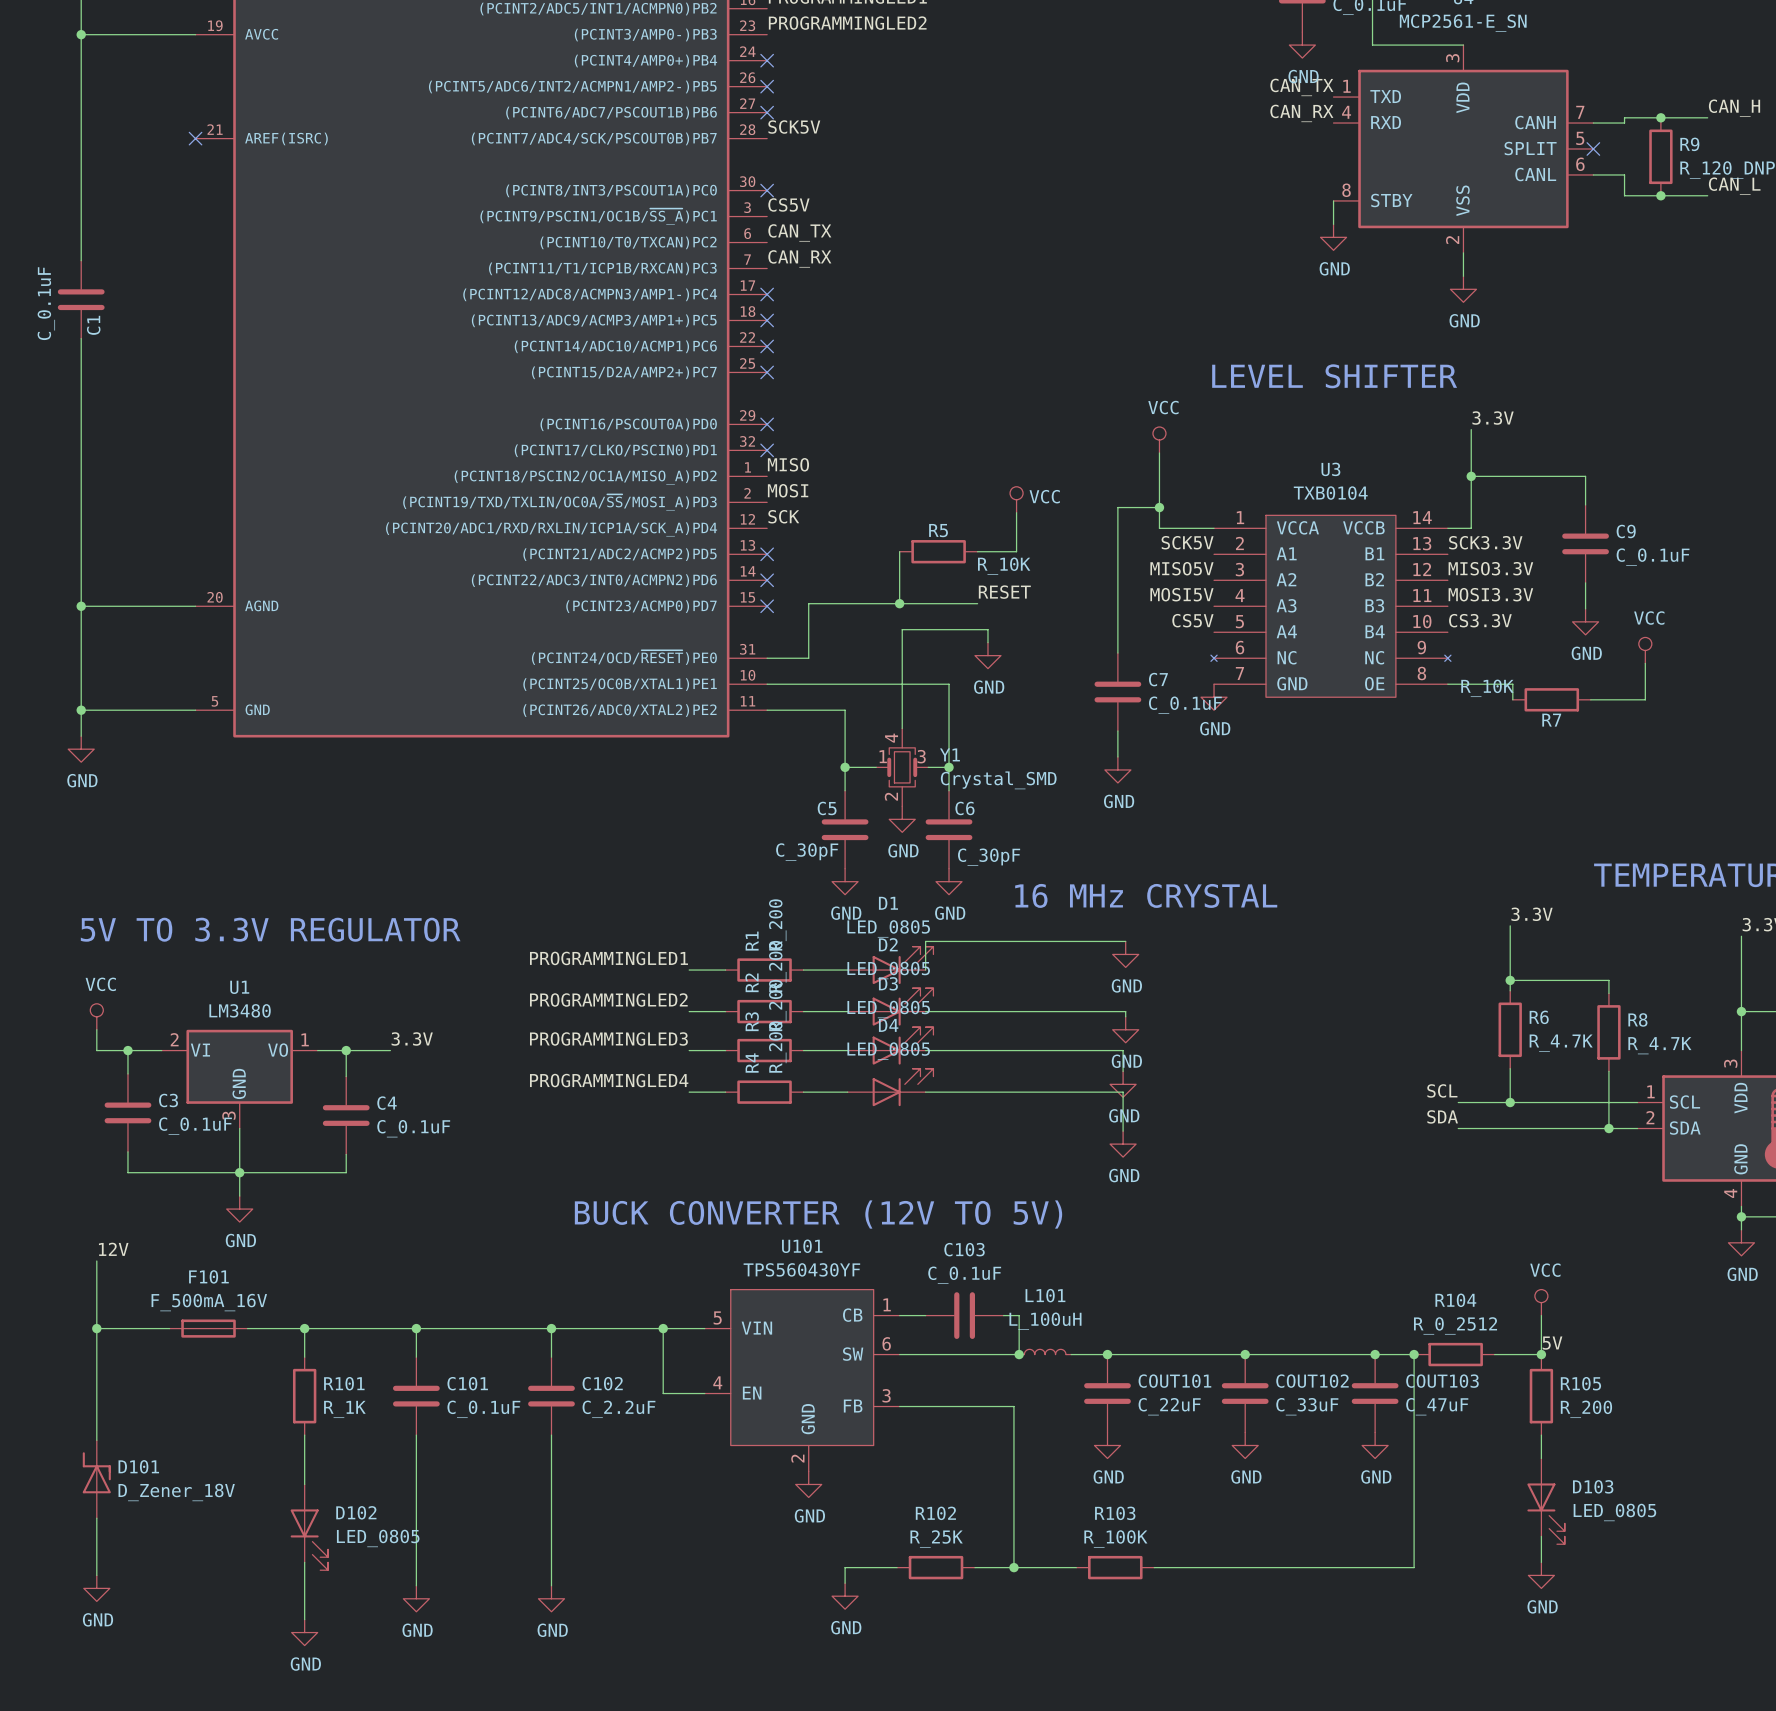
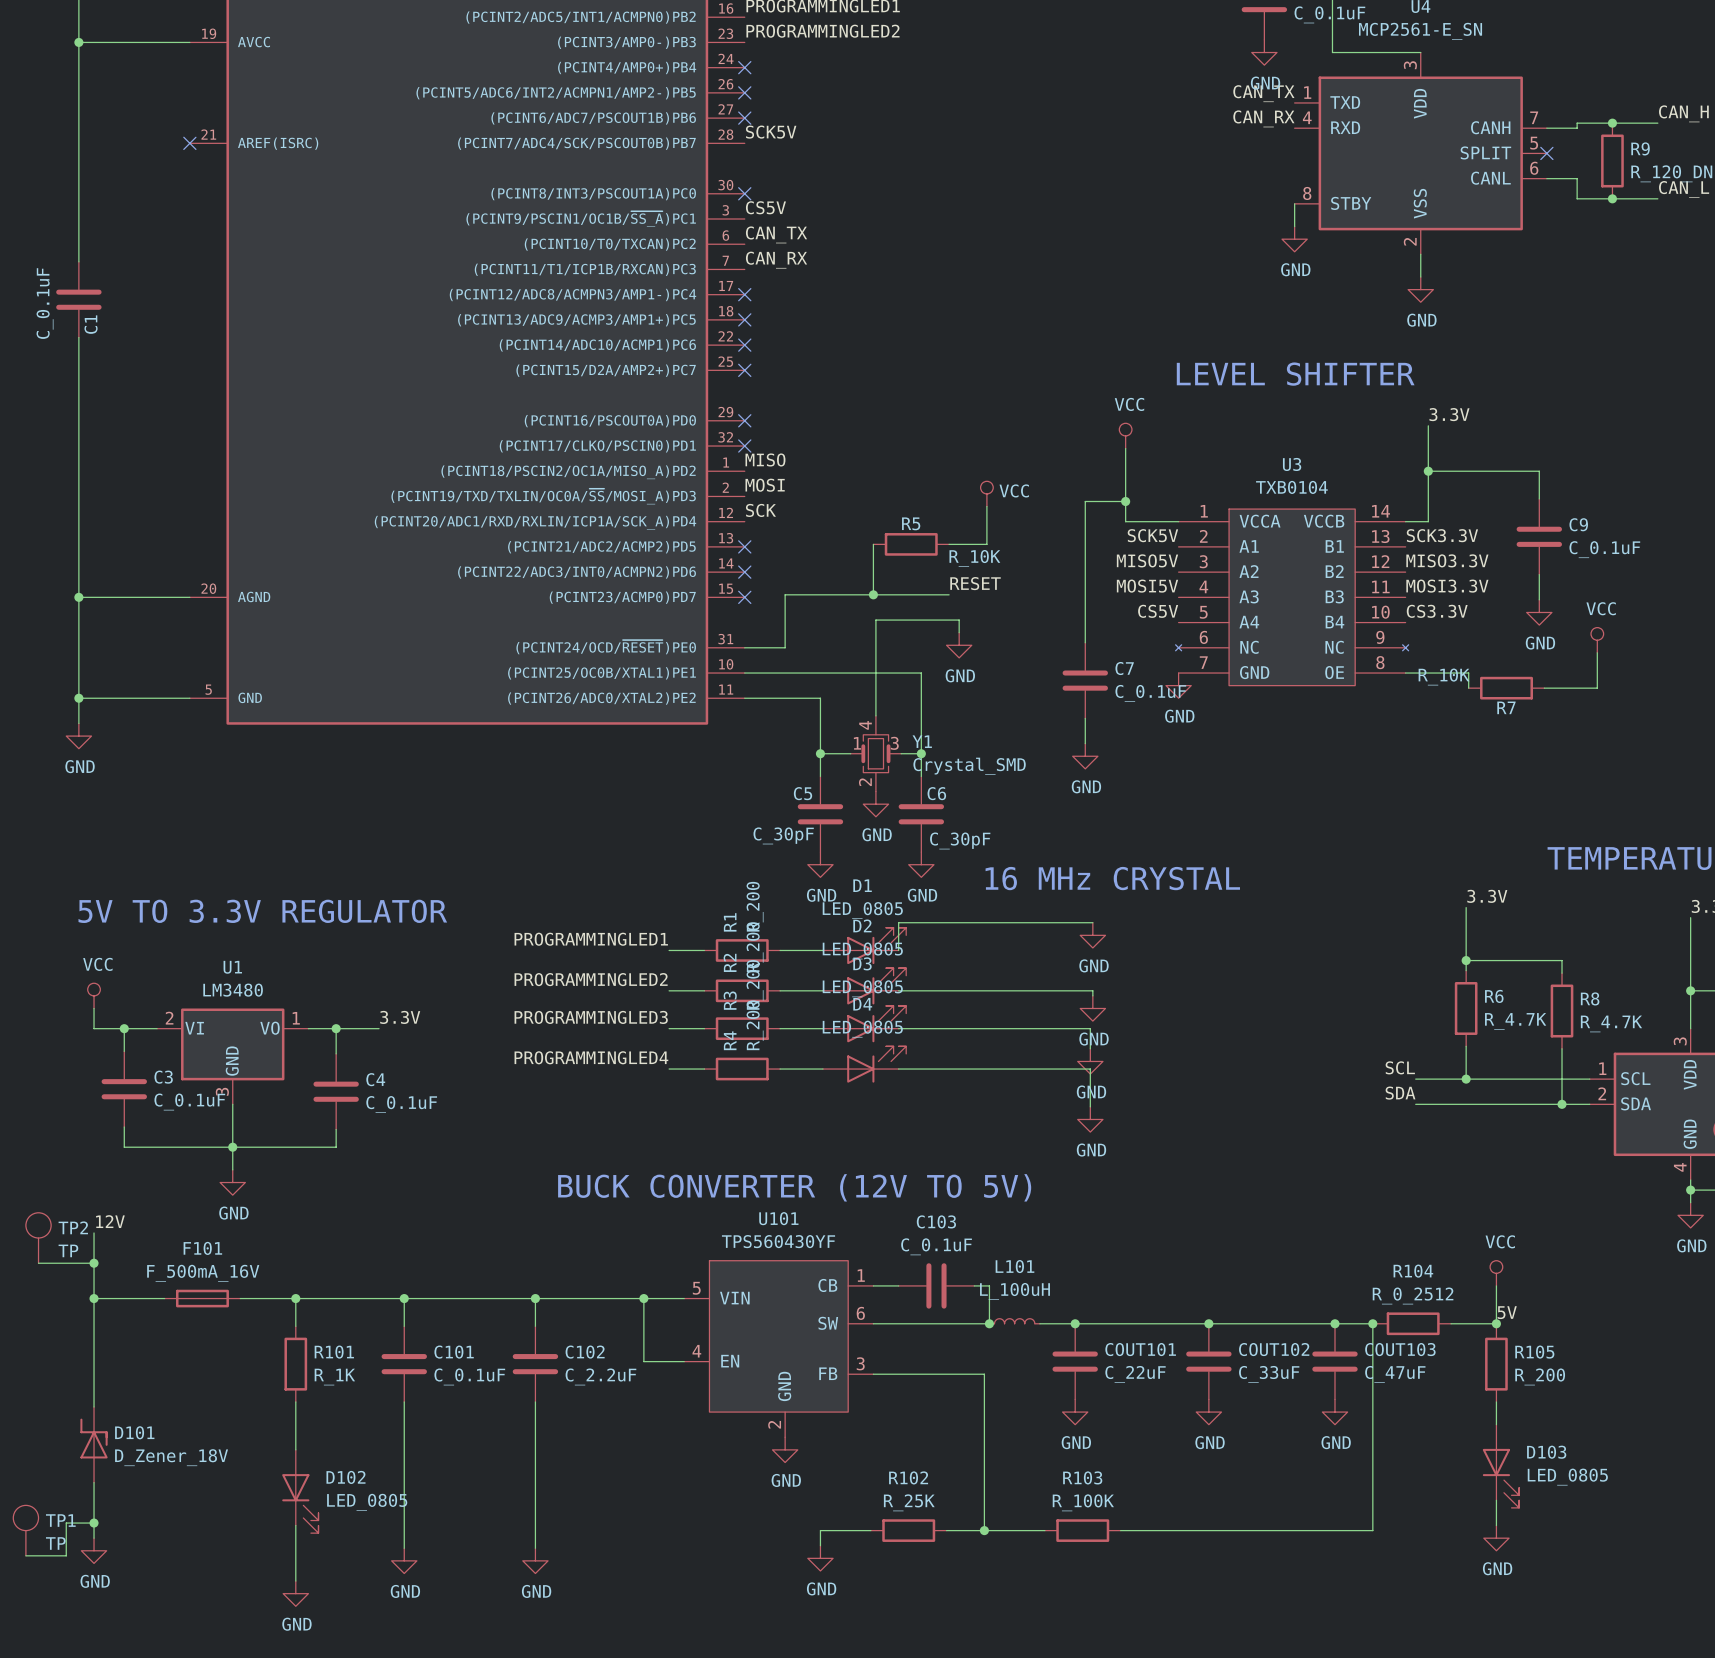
TP2: none -> TP (38, 1238)
wire: none -> (38, 1263) (94, 1263)
junction: none -> (94, 1263)
wire: none -> (94, 1523) (66, 1523) (66, 1555) (25, 1555)
junction: none -> (94, 1523)
TP1: none -> TP (25, 1530)

